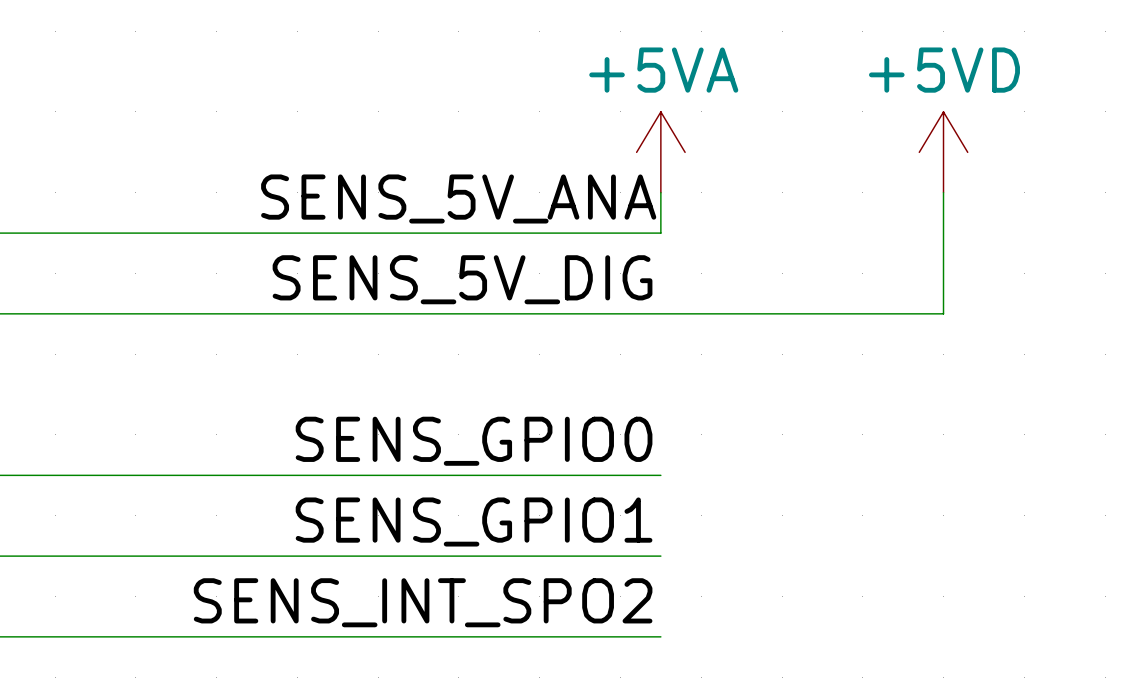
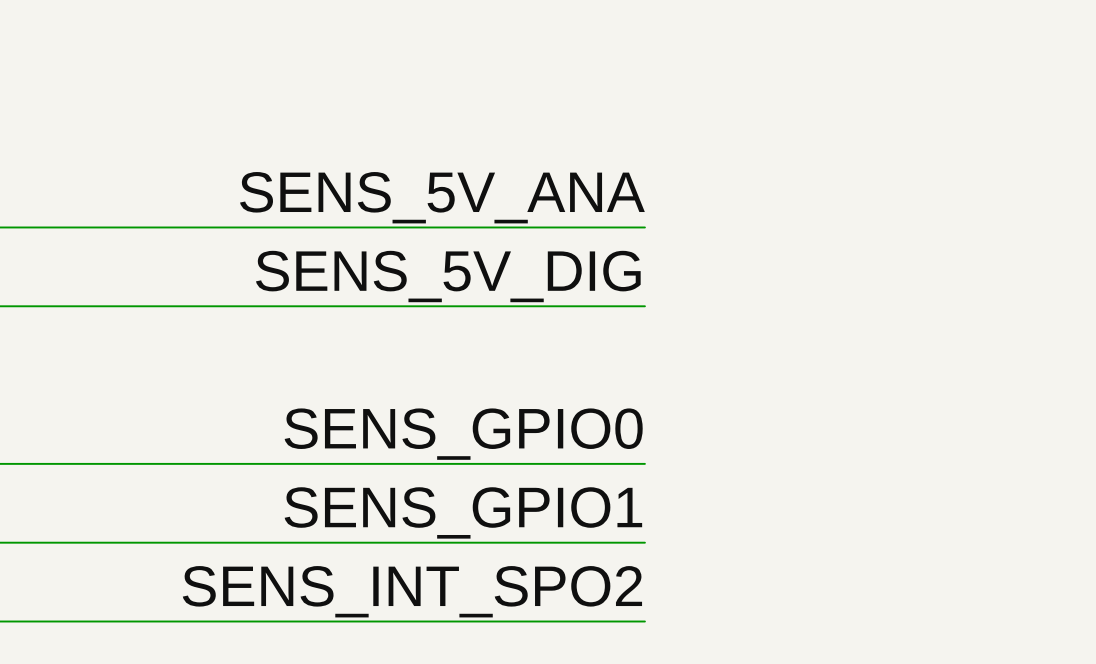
power symbol: +5VA (660, 152) -> none
power symbol: +5VD (943, 152) -> none
wire: (660, 192) (660, 233) -> none
wire: (943, 192) (943, 313) (660, 313) -> none

